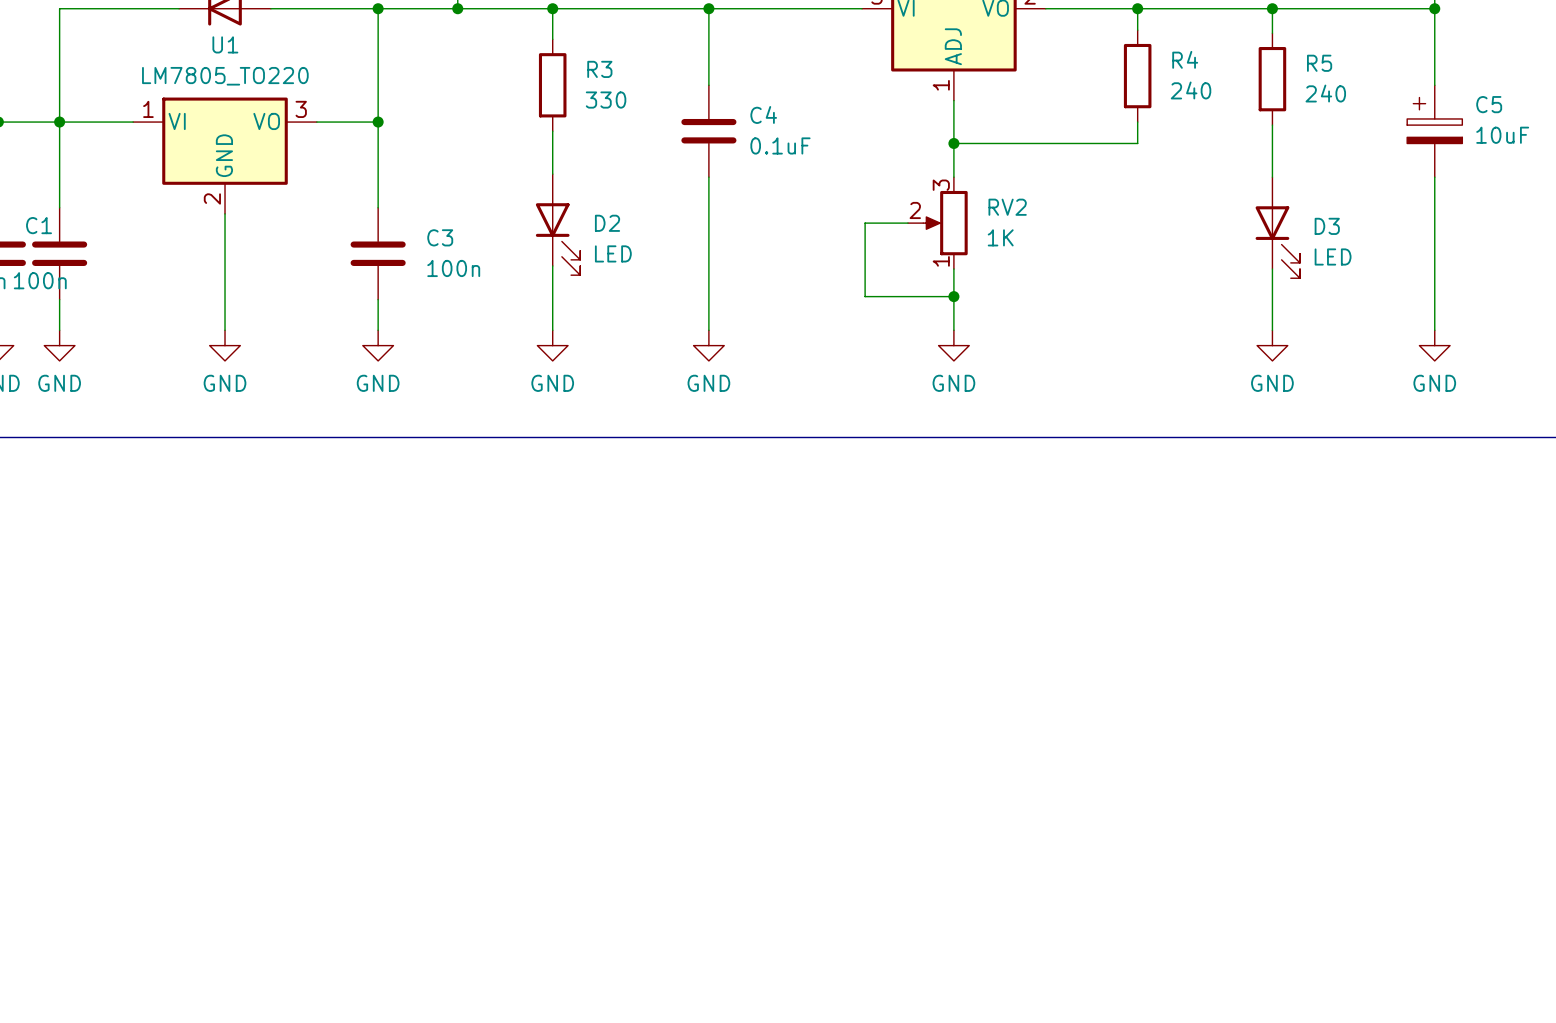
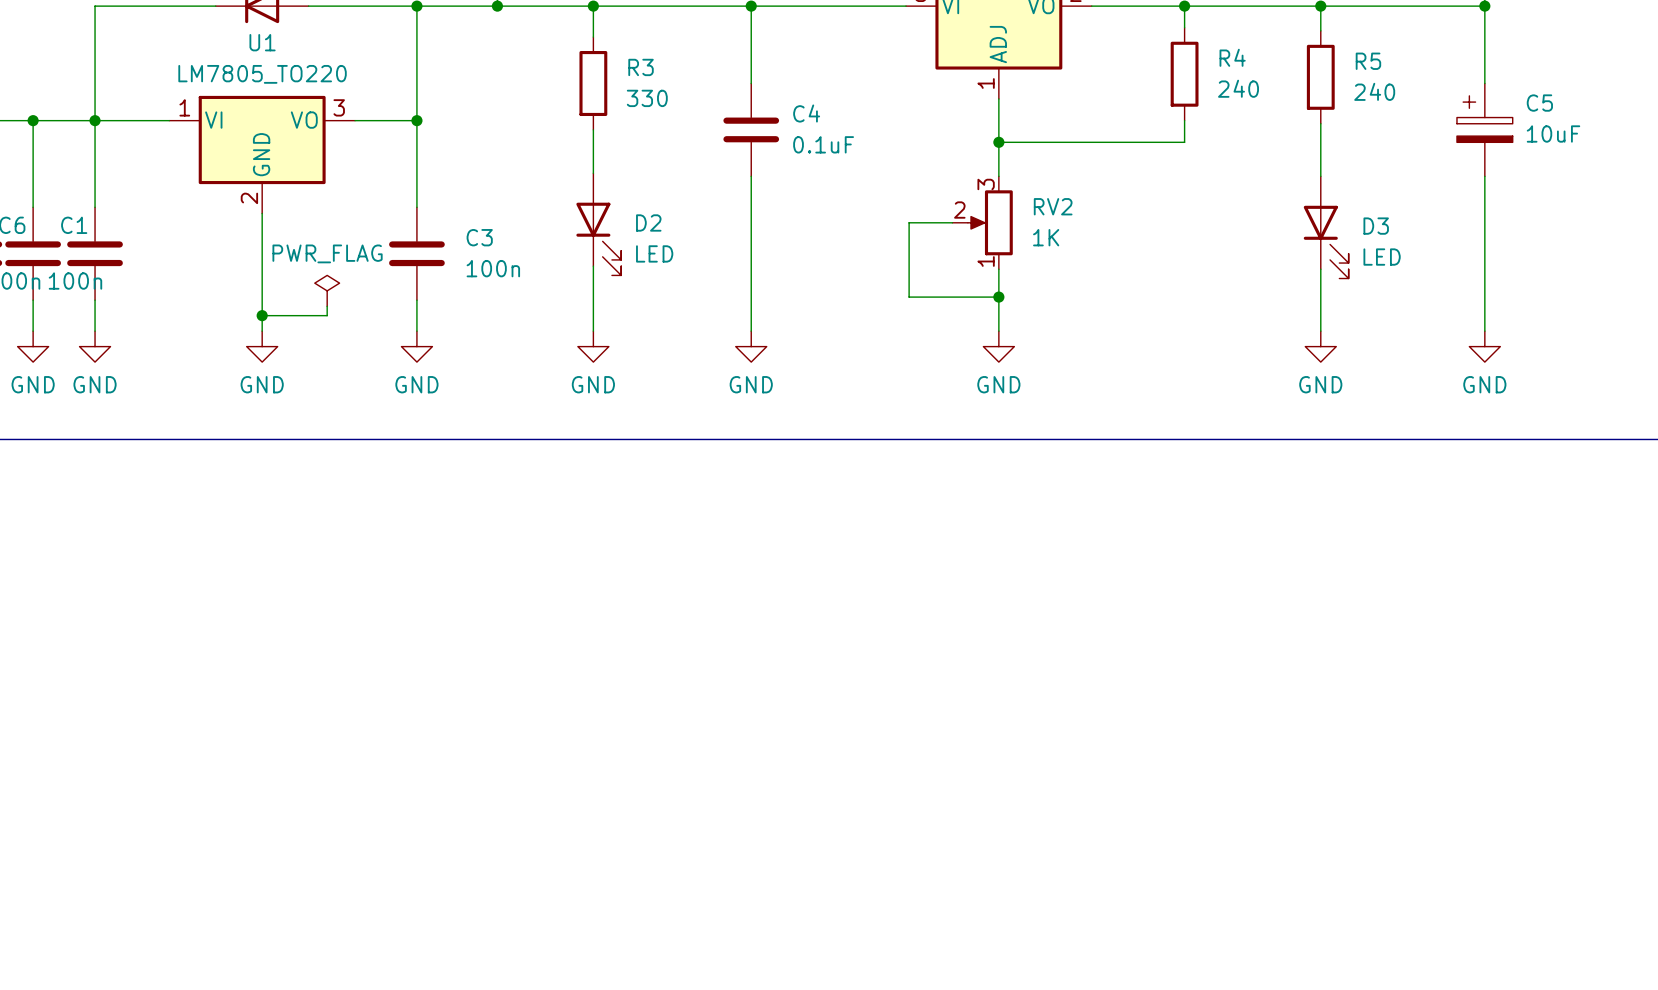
power symbol: none -> PWR_FLAG (327, 290)
wire: none -> (327, 306) (327, 315) (262, 315)
junction: none -> (262, 315)

